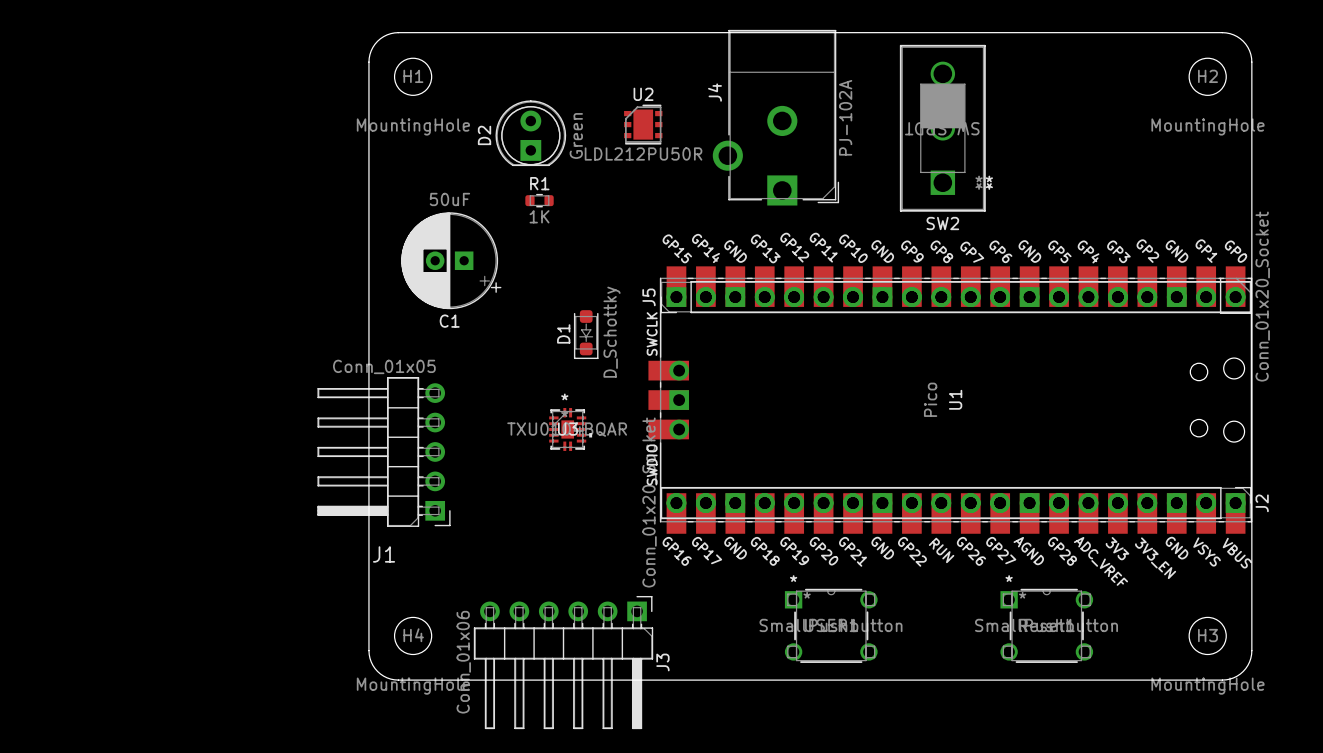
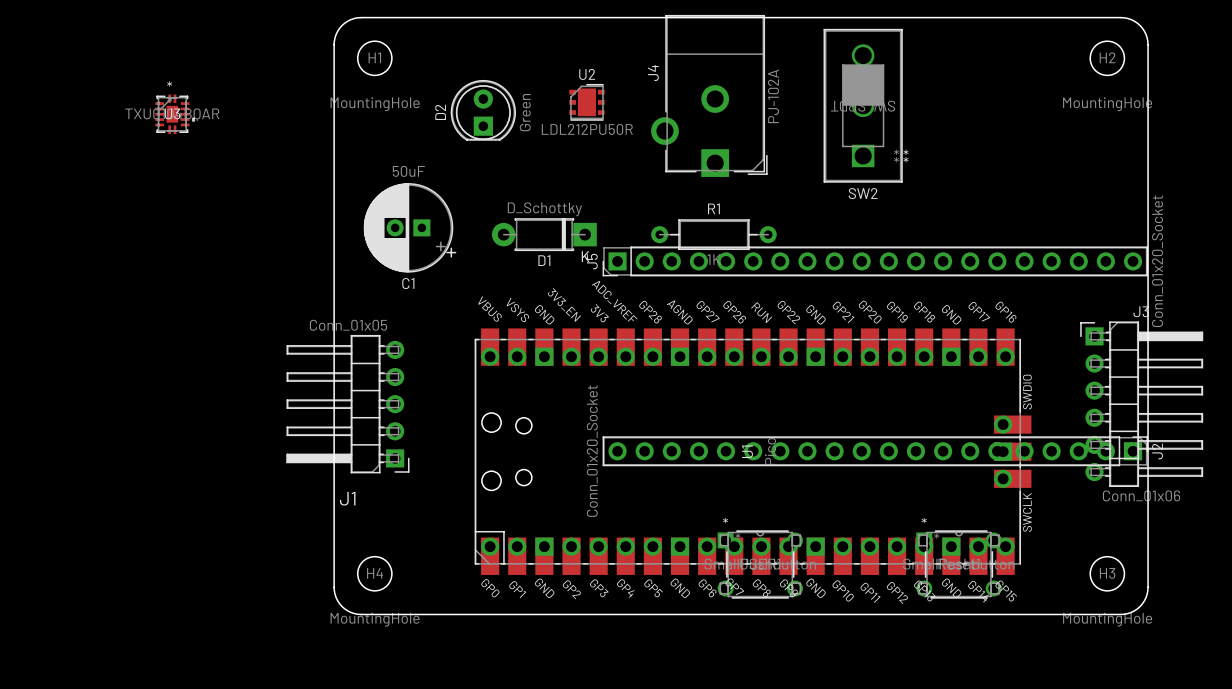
R1 footprint: [525, 193, 554, 208] -> [651, 219, 777, 250]
D1 footprint: [573, 310, 599, 360] -> [491, 218, 597, 251]
D1 value position: D_Schottky (612, 332) -> D_Schottky (544, 209)
D1 name position: D1 (563, 333) -> D1 (544, 260)
U1 rotation: 0° (950, 400) -> 180° (753, 451)
U3 position: (570, 429) -> (175, 114)
J3 rotation: 0° (563, 662) -> 90° counterclockwise (1141, 404)
J3 position: (563, 662) -> (1141, 404)

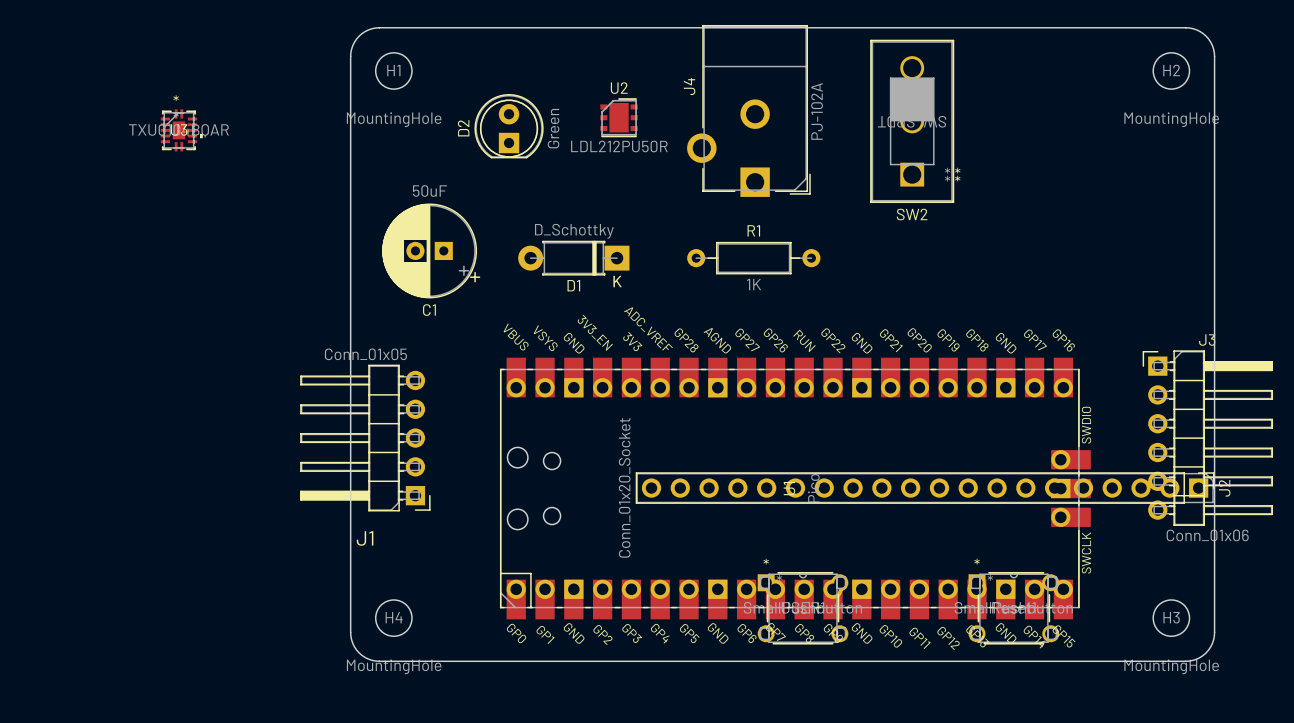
J5: Conn_01x20_Socket (875, 261) -> none

